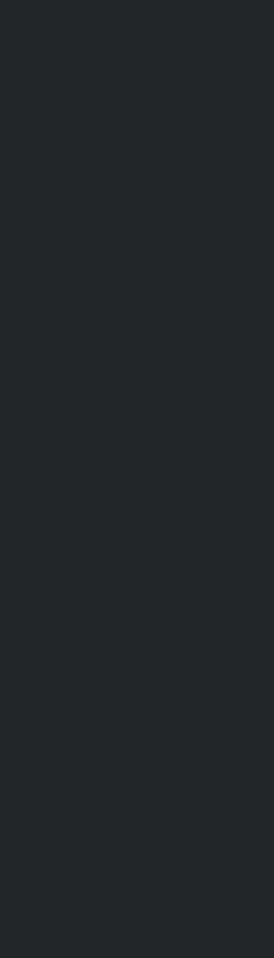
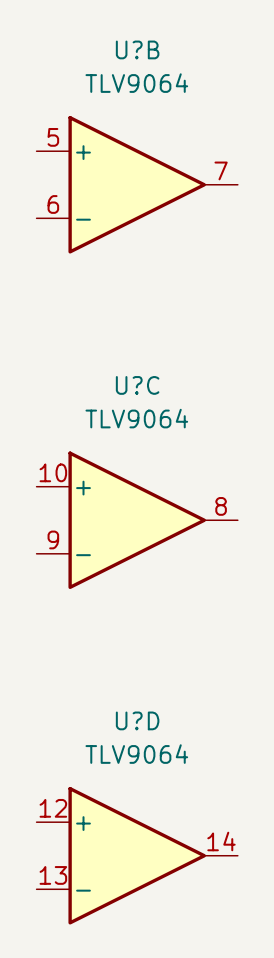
U?B: none -> TLV9064 (137, 184)
U?C: none -> TLV9064 (137, 520)
U?D: none -> TLV9064 (137, 855)

